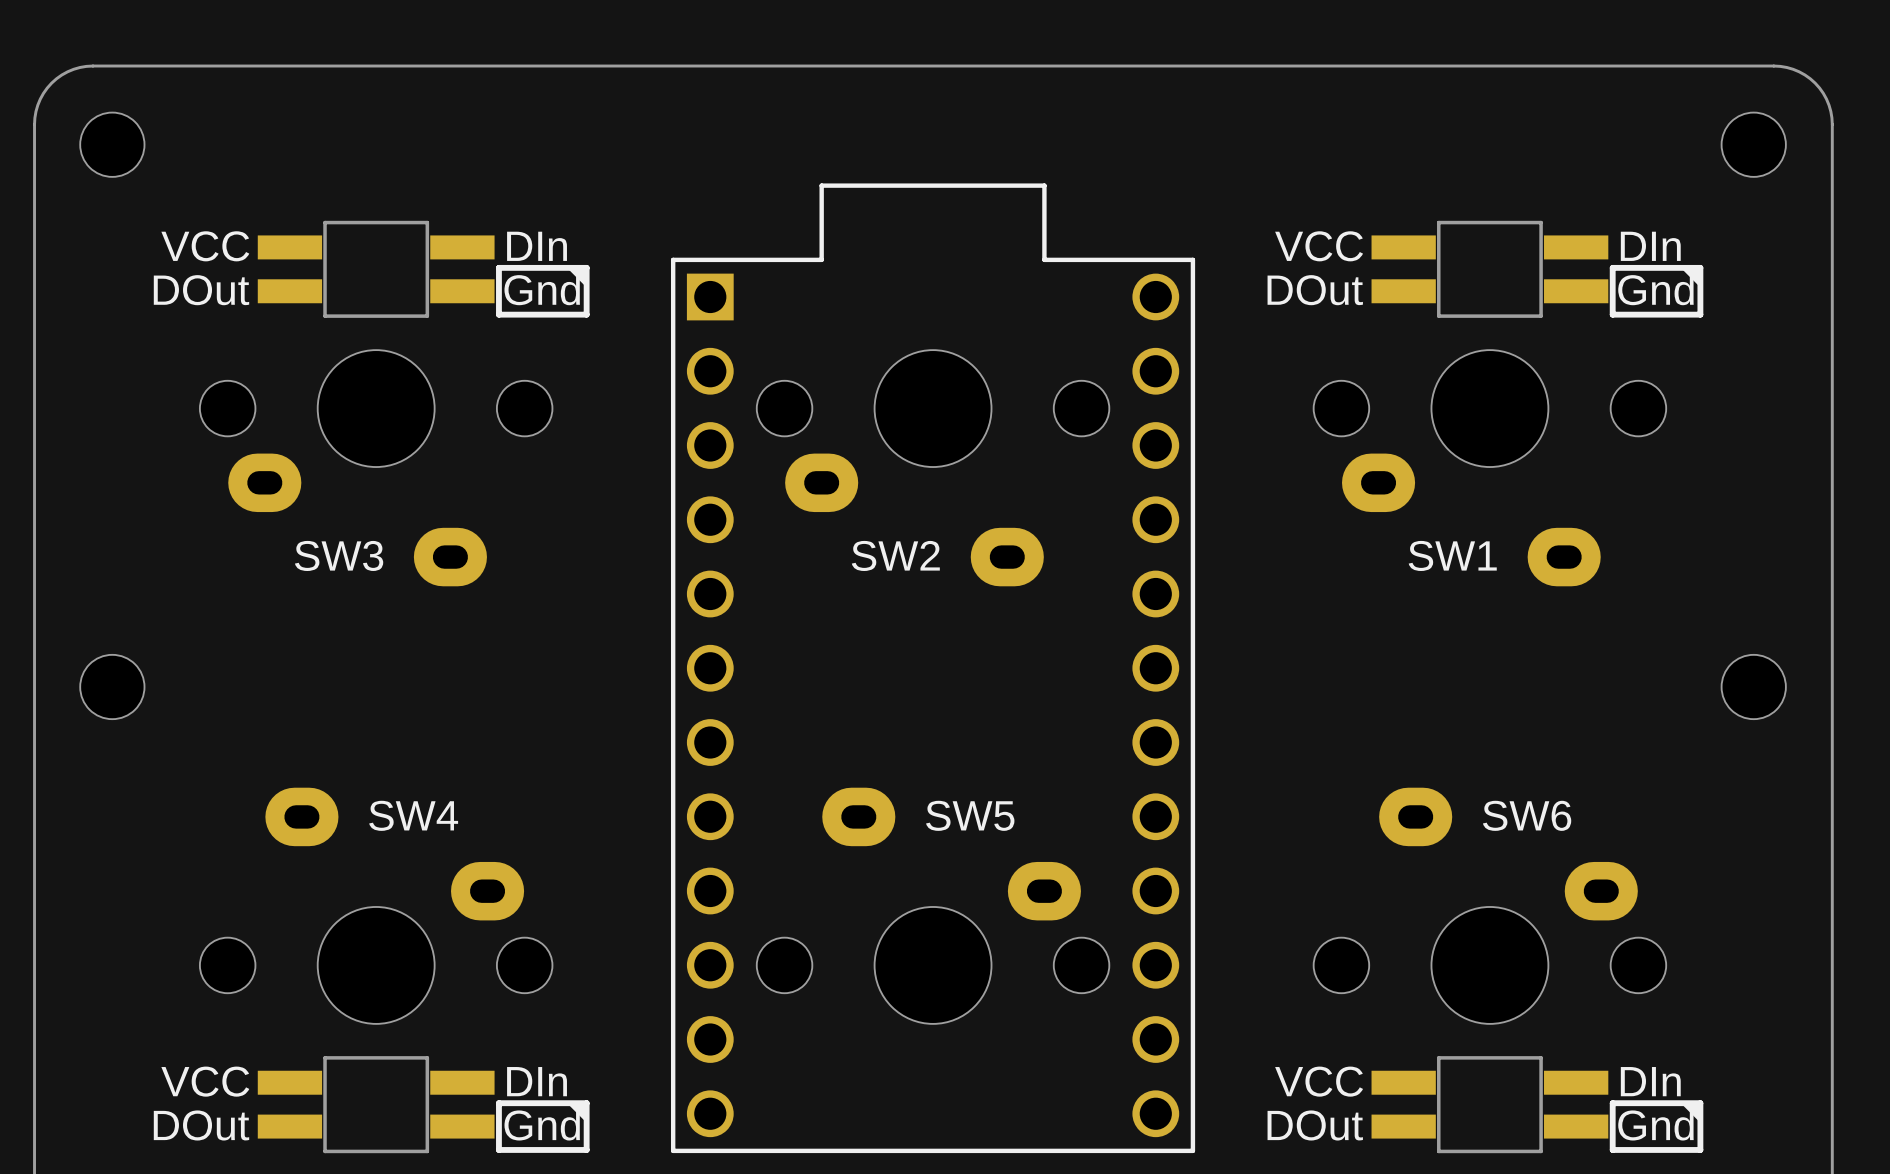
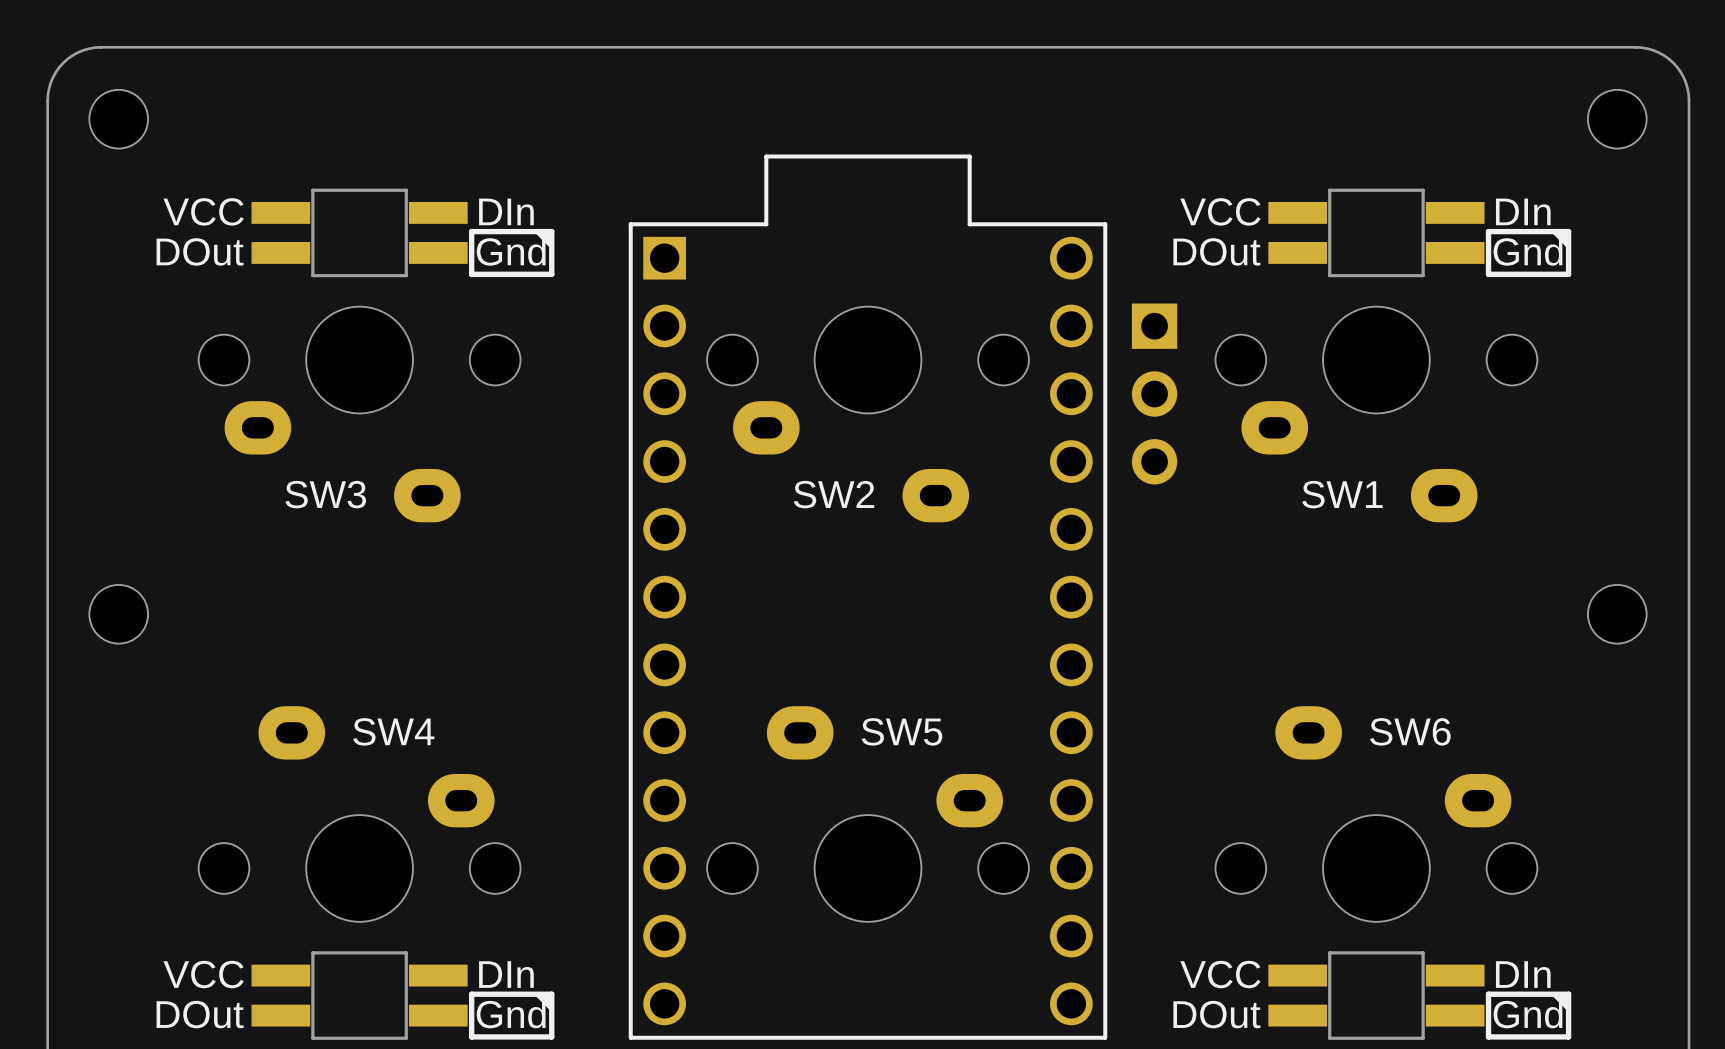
part: none -> (1154, 393)

